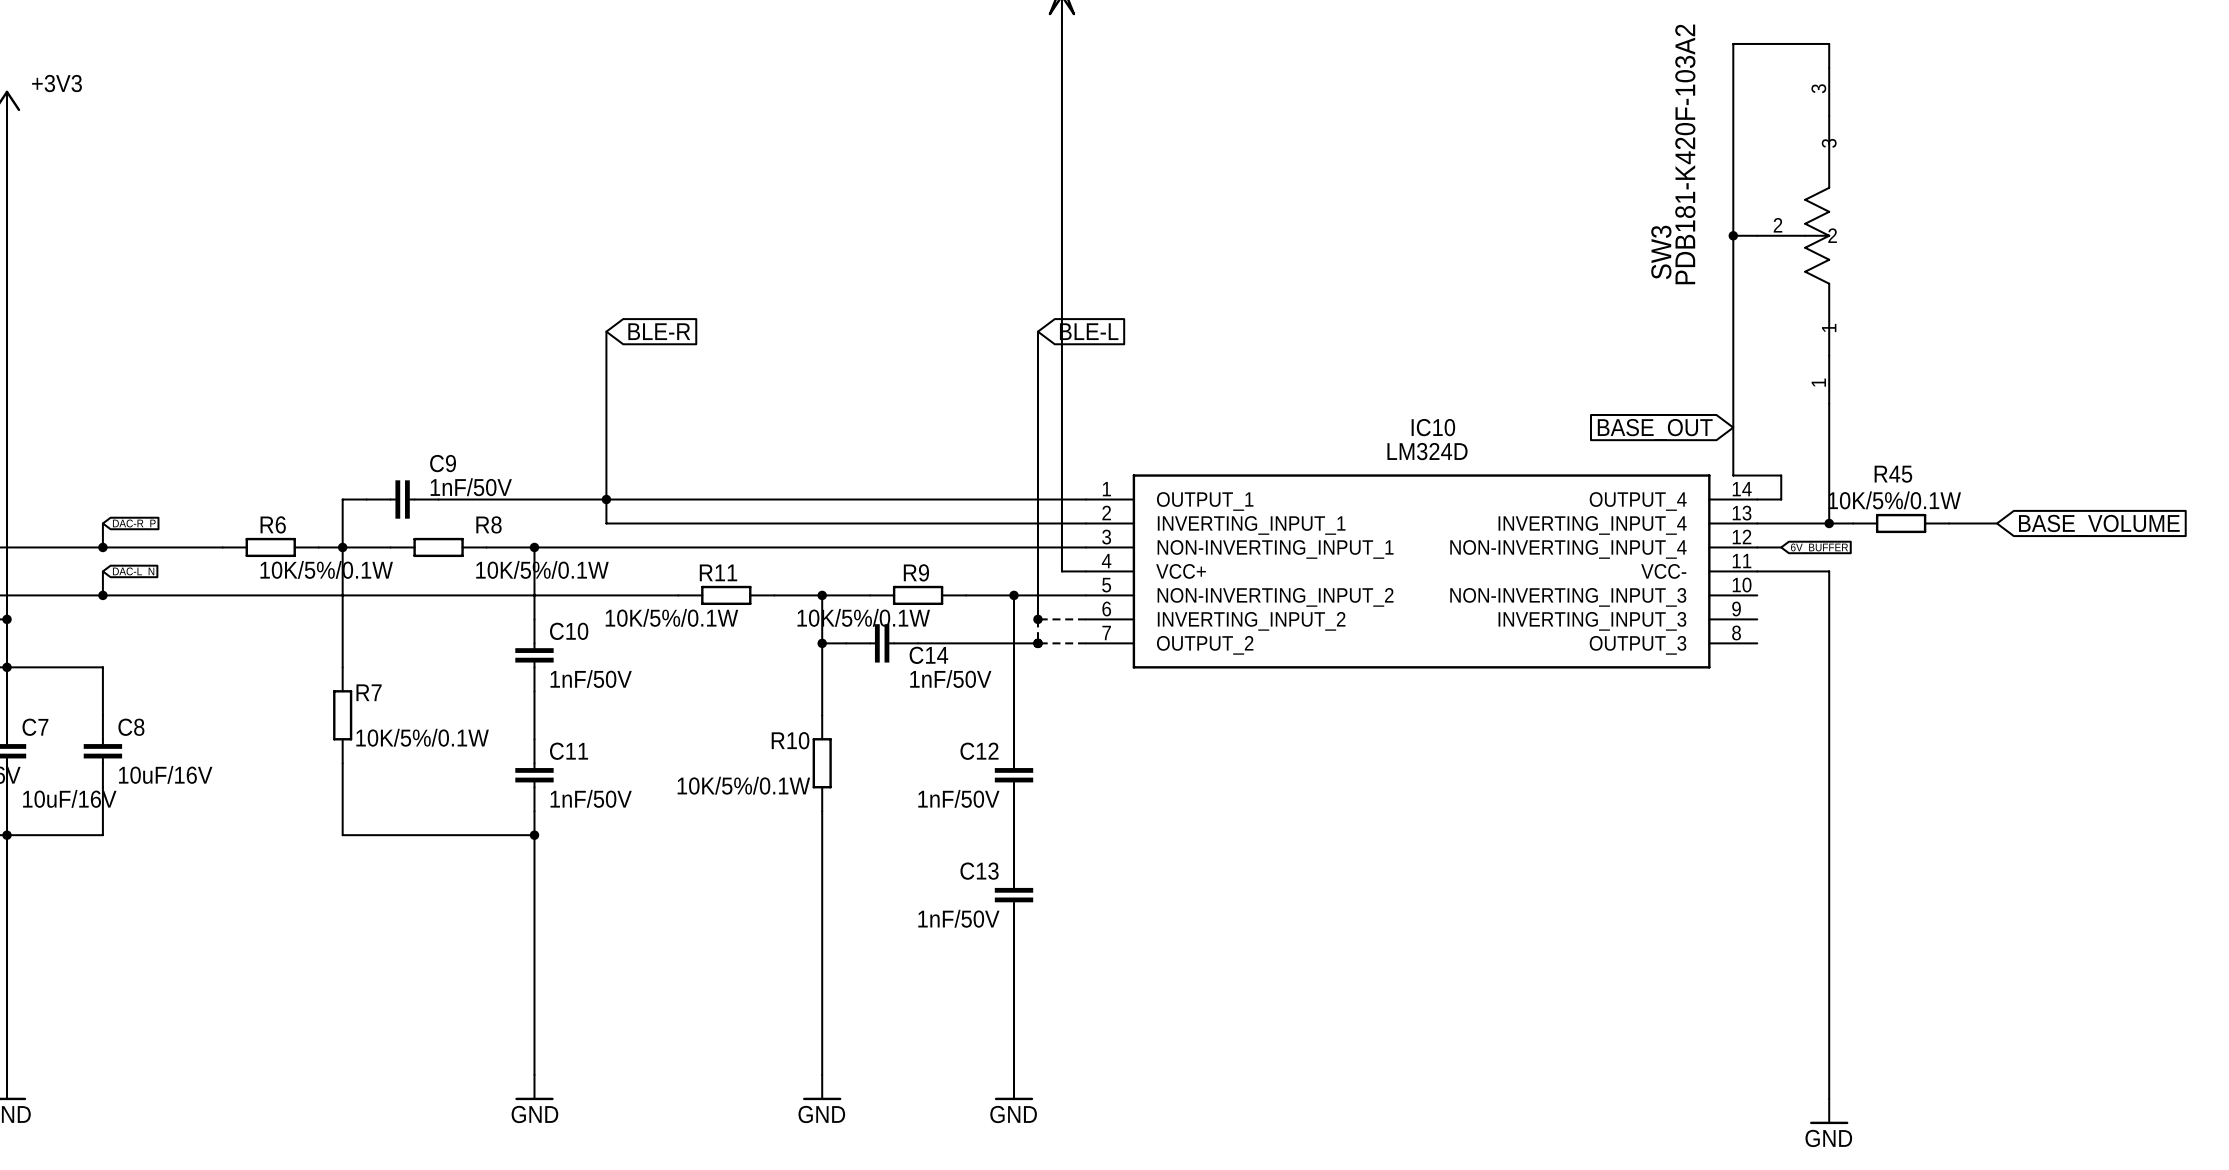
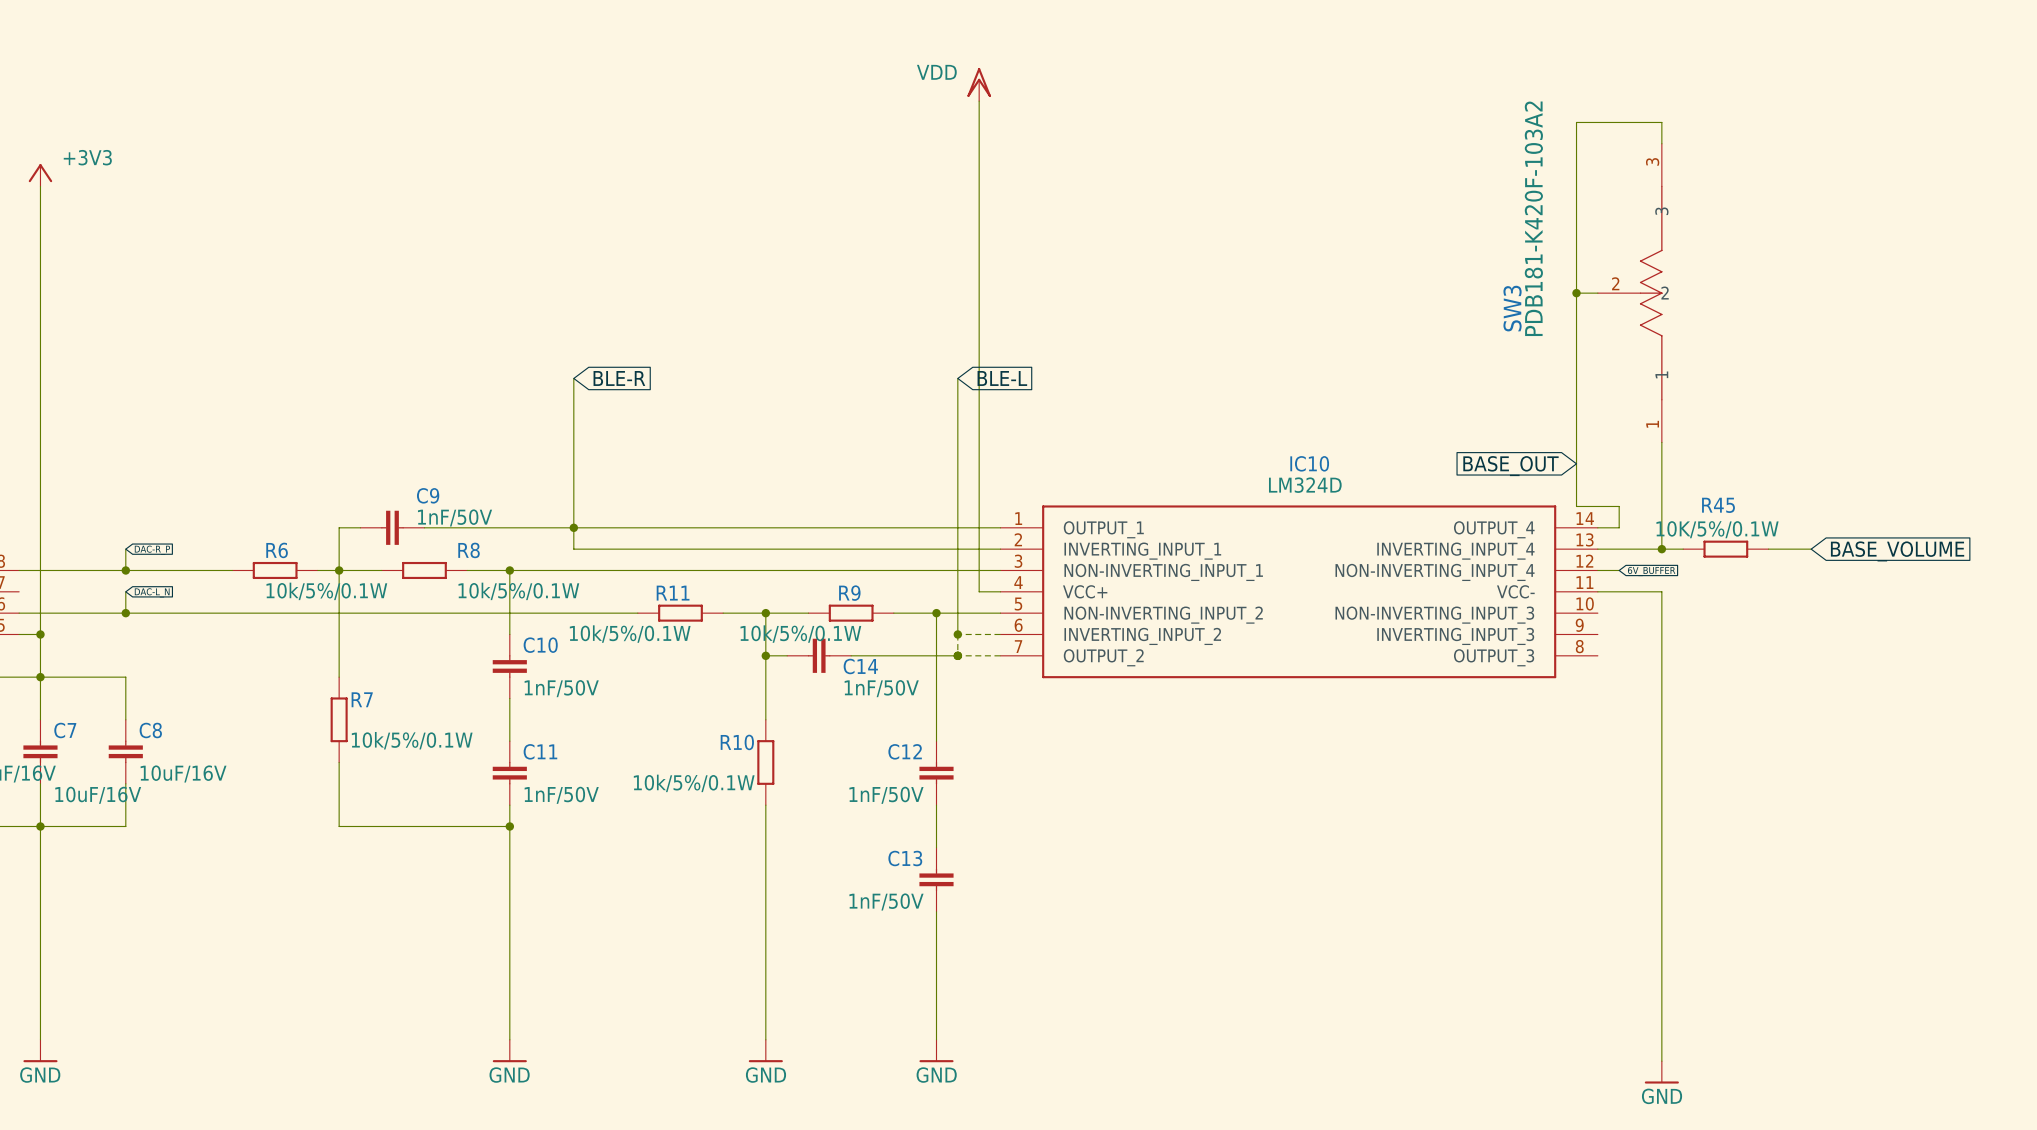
R6 value: 10K/5%/0.1W (326, 569) -> 10k/5%/0.1W (326, 591)
R8 value: 10K/5%/0.1W (542, 569) -> 10k/5%/0.1W (518, 591)
R11 value: 10K/5%/0.1W (671, 617) -> 10k/5%/0.1W (630, 634)
R9 value: 10K/5%/0.1W (863, 617) -> 10k/5%/0.1W (800, 634)
R7 value: 10K/5%/0.1W (422, 737) -> 10k/5%/0.1W (412, 740)
R10 value: 10K/5%/0.1W (743, 785) -> 10k/5%/0.1W (694, 783)

